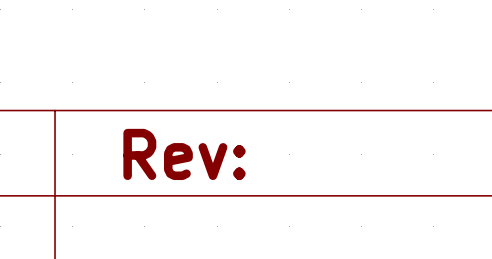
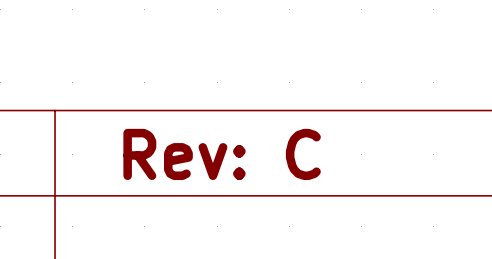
title block: Rev: (184, 154) -> Rev: C (222, 154)

